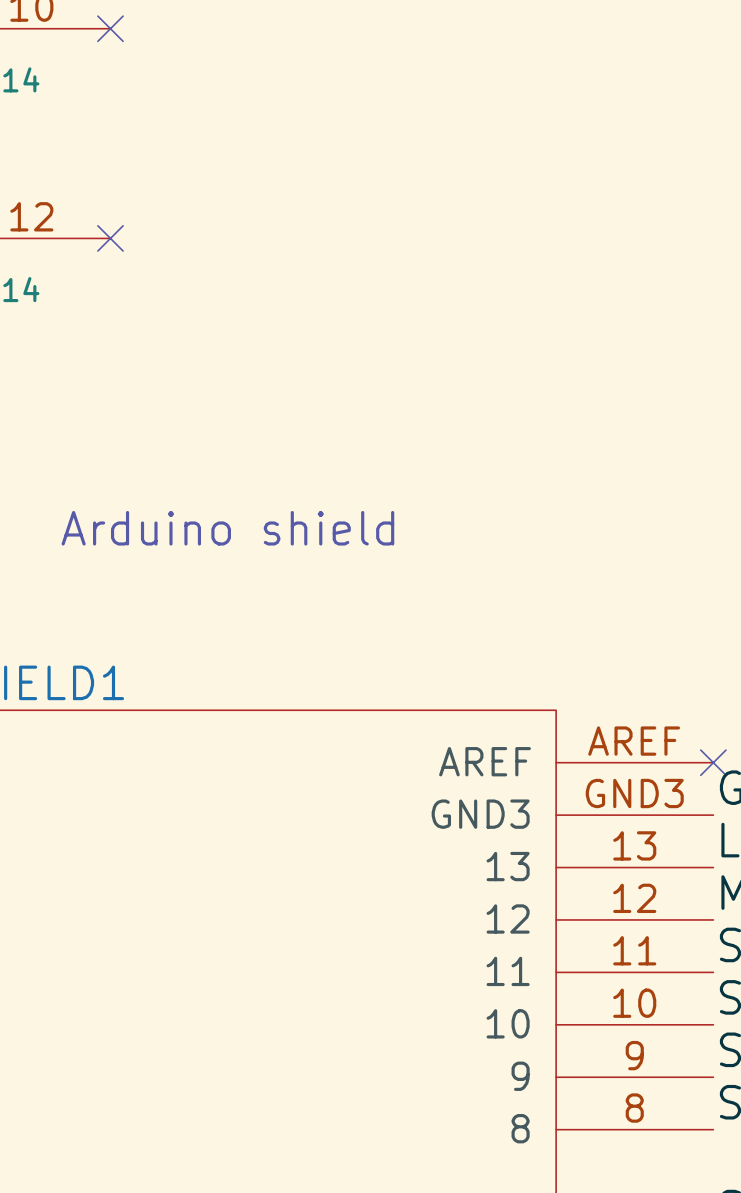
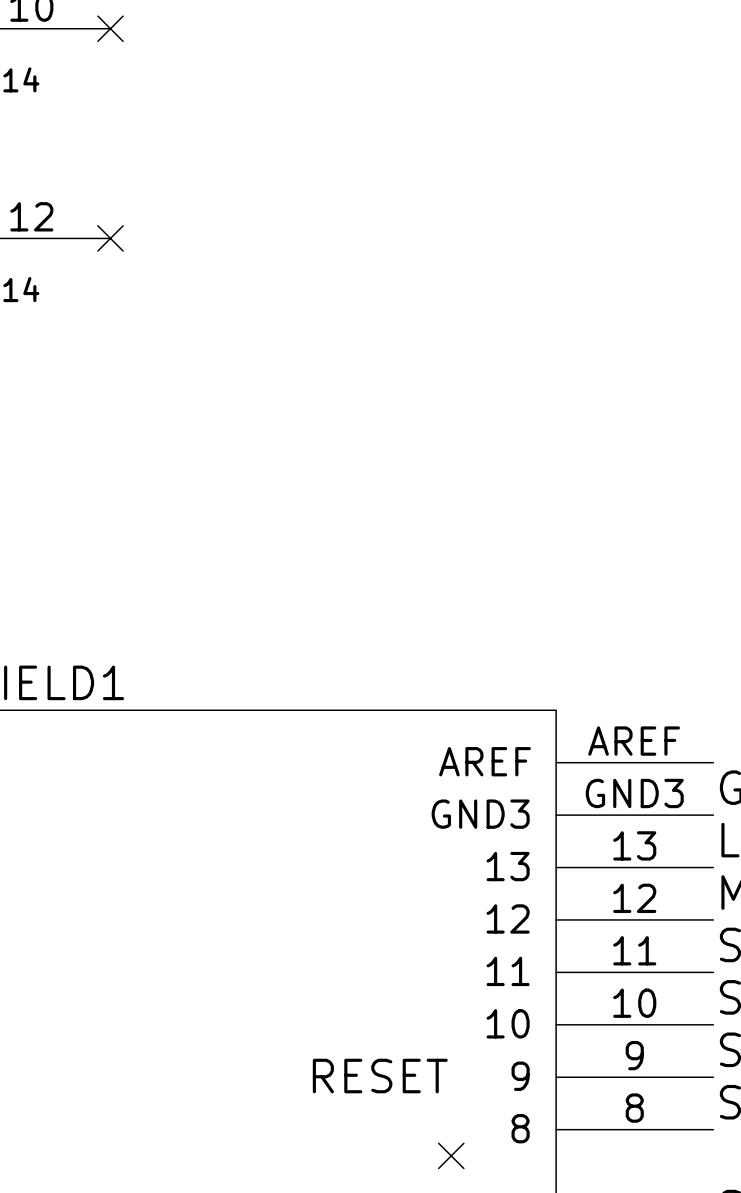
text: Arduino shield (227, 528) -> none
no-connect mark: (713, 762) -> none
label: none -> RESET (380, 1076)
no-connect mark: none -> (451, 1155)

